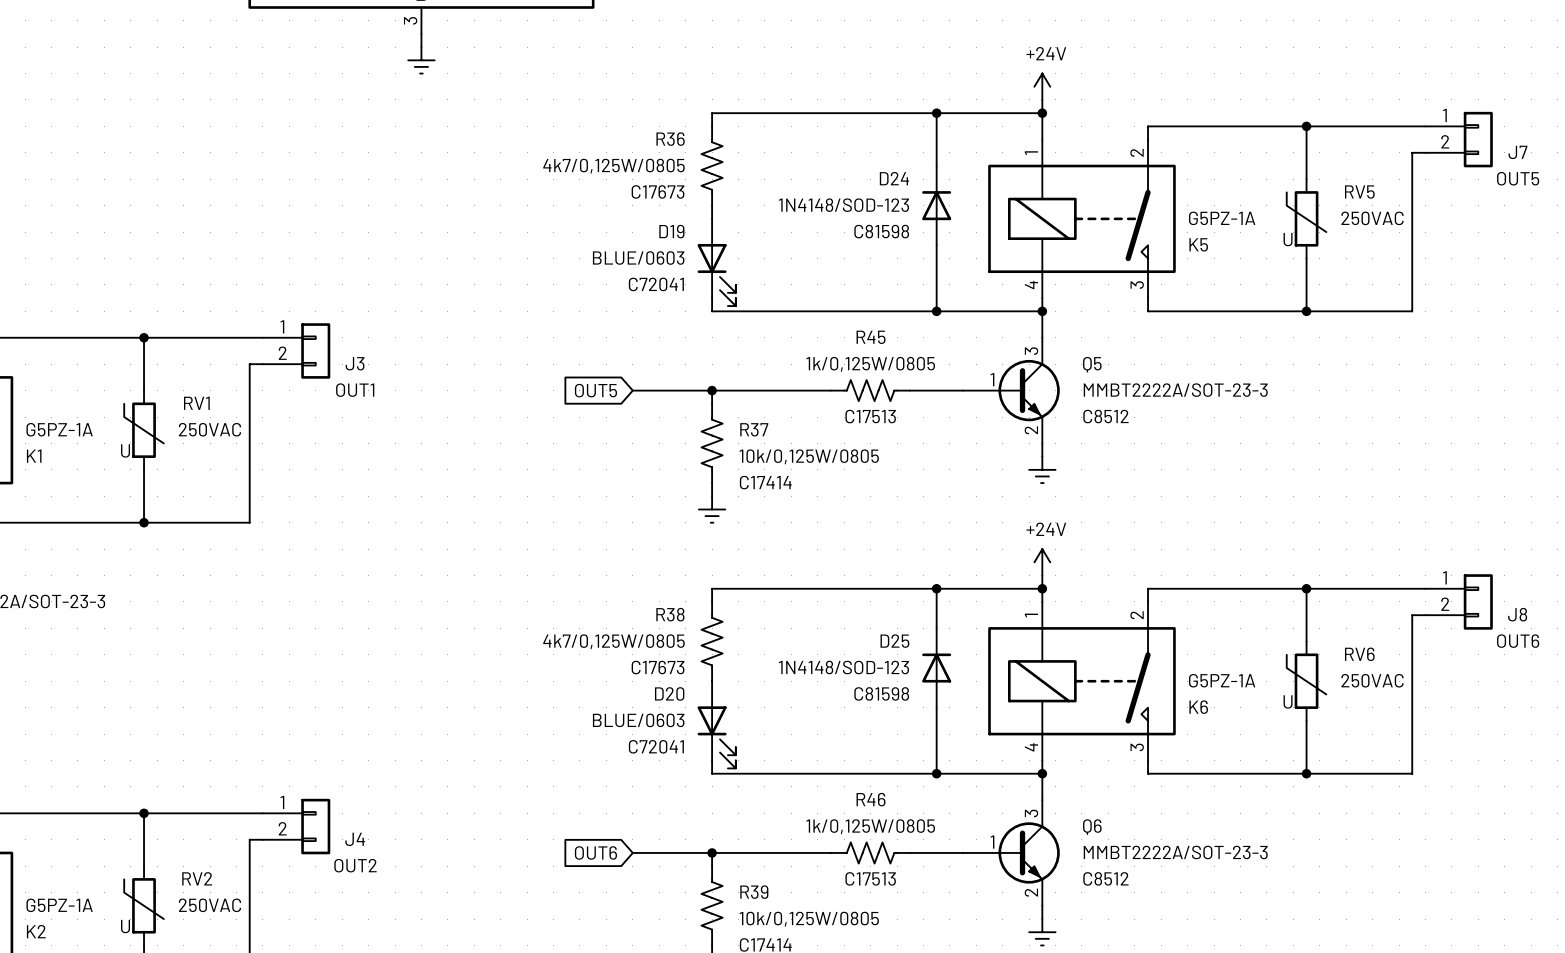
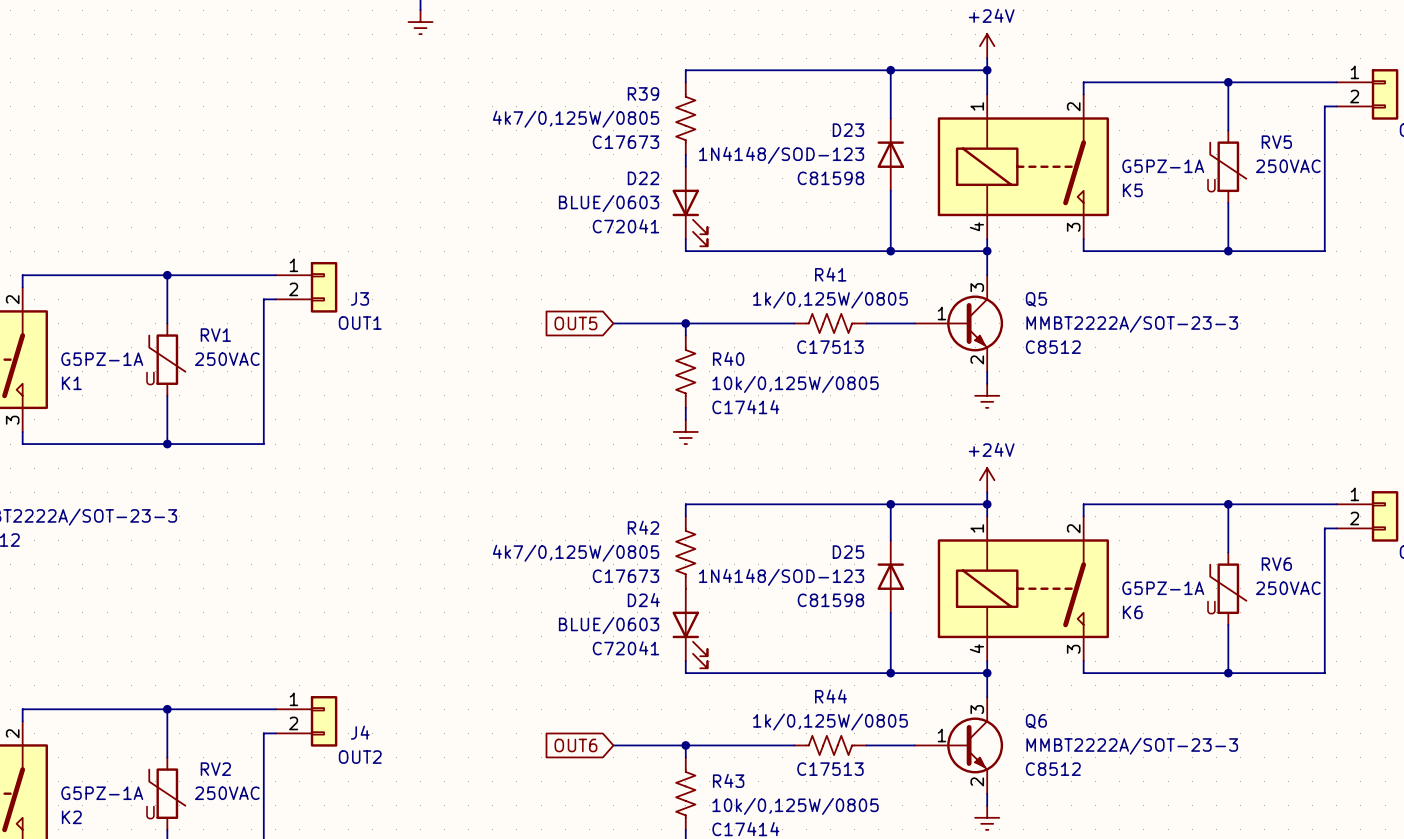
R36 name: R36 (670, 139) -> R39 (643, 93)
D24 name: D24 (894, 178) -> D23 (848, 130)
D19 name: D19 (671, 231) -> D22 (643, 178)
R45 name: R45 (871, 337) -> R41 (830, 274)
R37 name: R37 (754, 429) -> R40 (728, 358)
R38 name: R38 (670, 614) -> R42 (643, 527)
D20 name: D20 (669, 693) -> D24 (643, 600)
R46 name: R46 (871, 799) -> R44 (831, 696)
R39 name: R39 (754, 892) -> R43 (728, 780)

